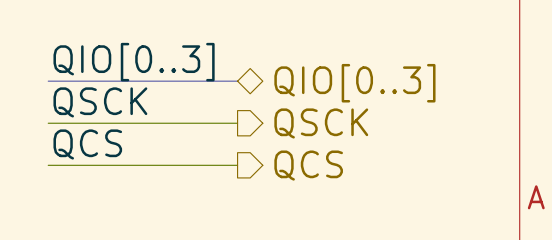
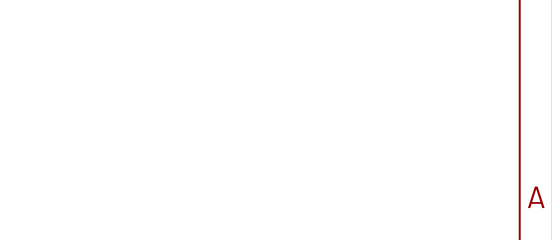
label: QIO[0..3] (134, 62) -> none
bus: (48, 81) (237, 81) -> none
hierarchical label: QIO[0..3] (354, 83) -> none
label: QSCK (100, 102) -> none
wire: (48, 123) (237, 123) -> none
hierarchical label: QSCK (321, 123) -> none
label: QCS (87, 144) -> none
wire: (48, 165) (237, 165) -> none
hierarchical label: QCS (308, 165) -> none

